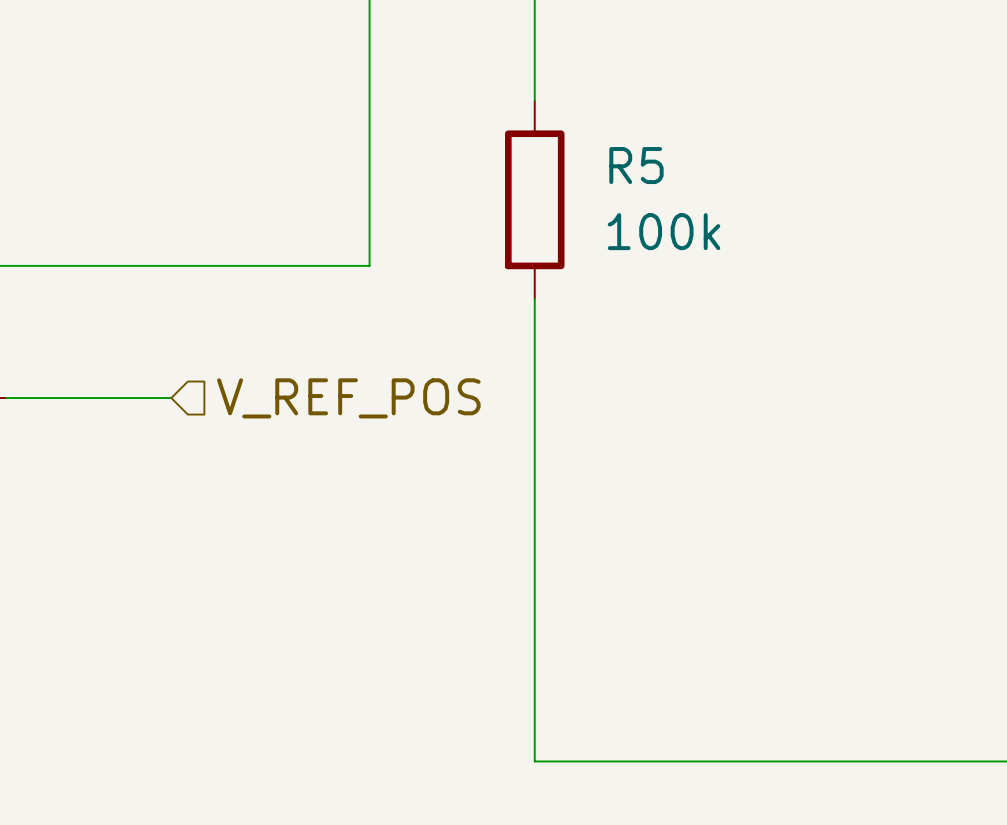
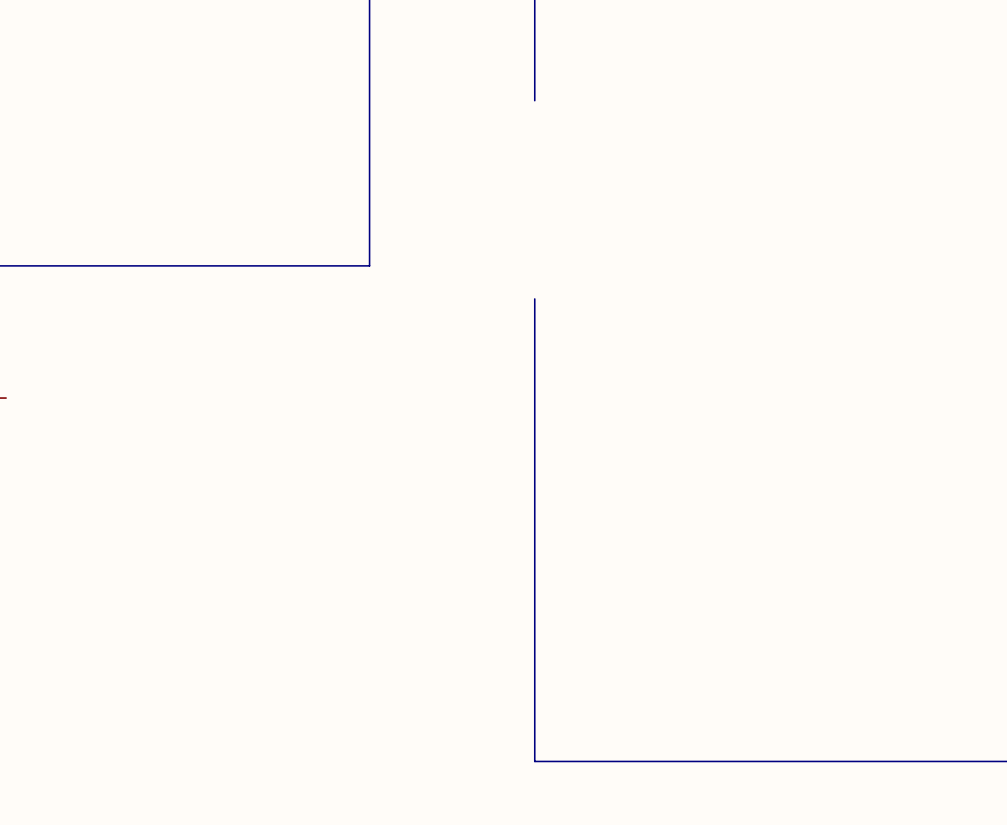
R5: 100k (534, 199) -> none
wire: (6, 398) (171, 398) -> none
hierarchical label: V_REF_POS (348, 398) -> none

